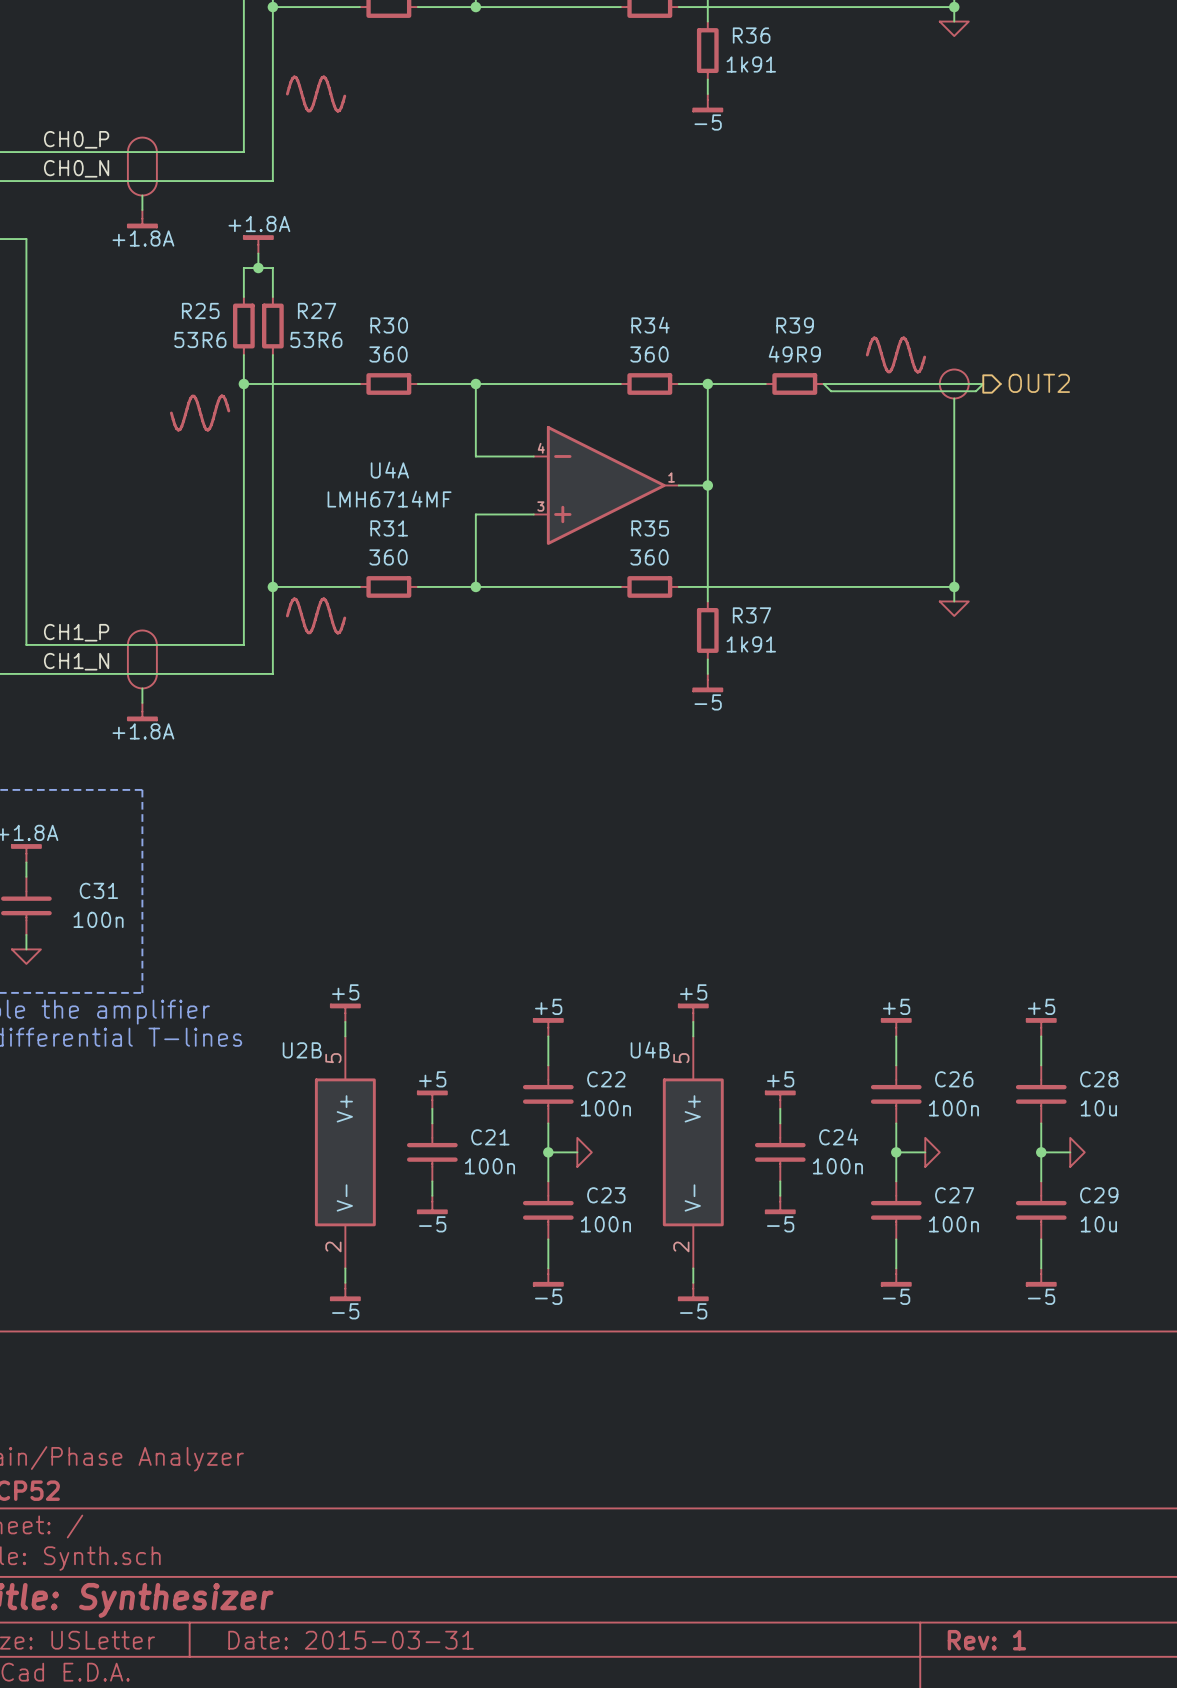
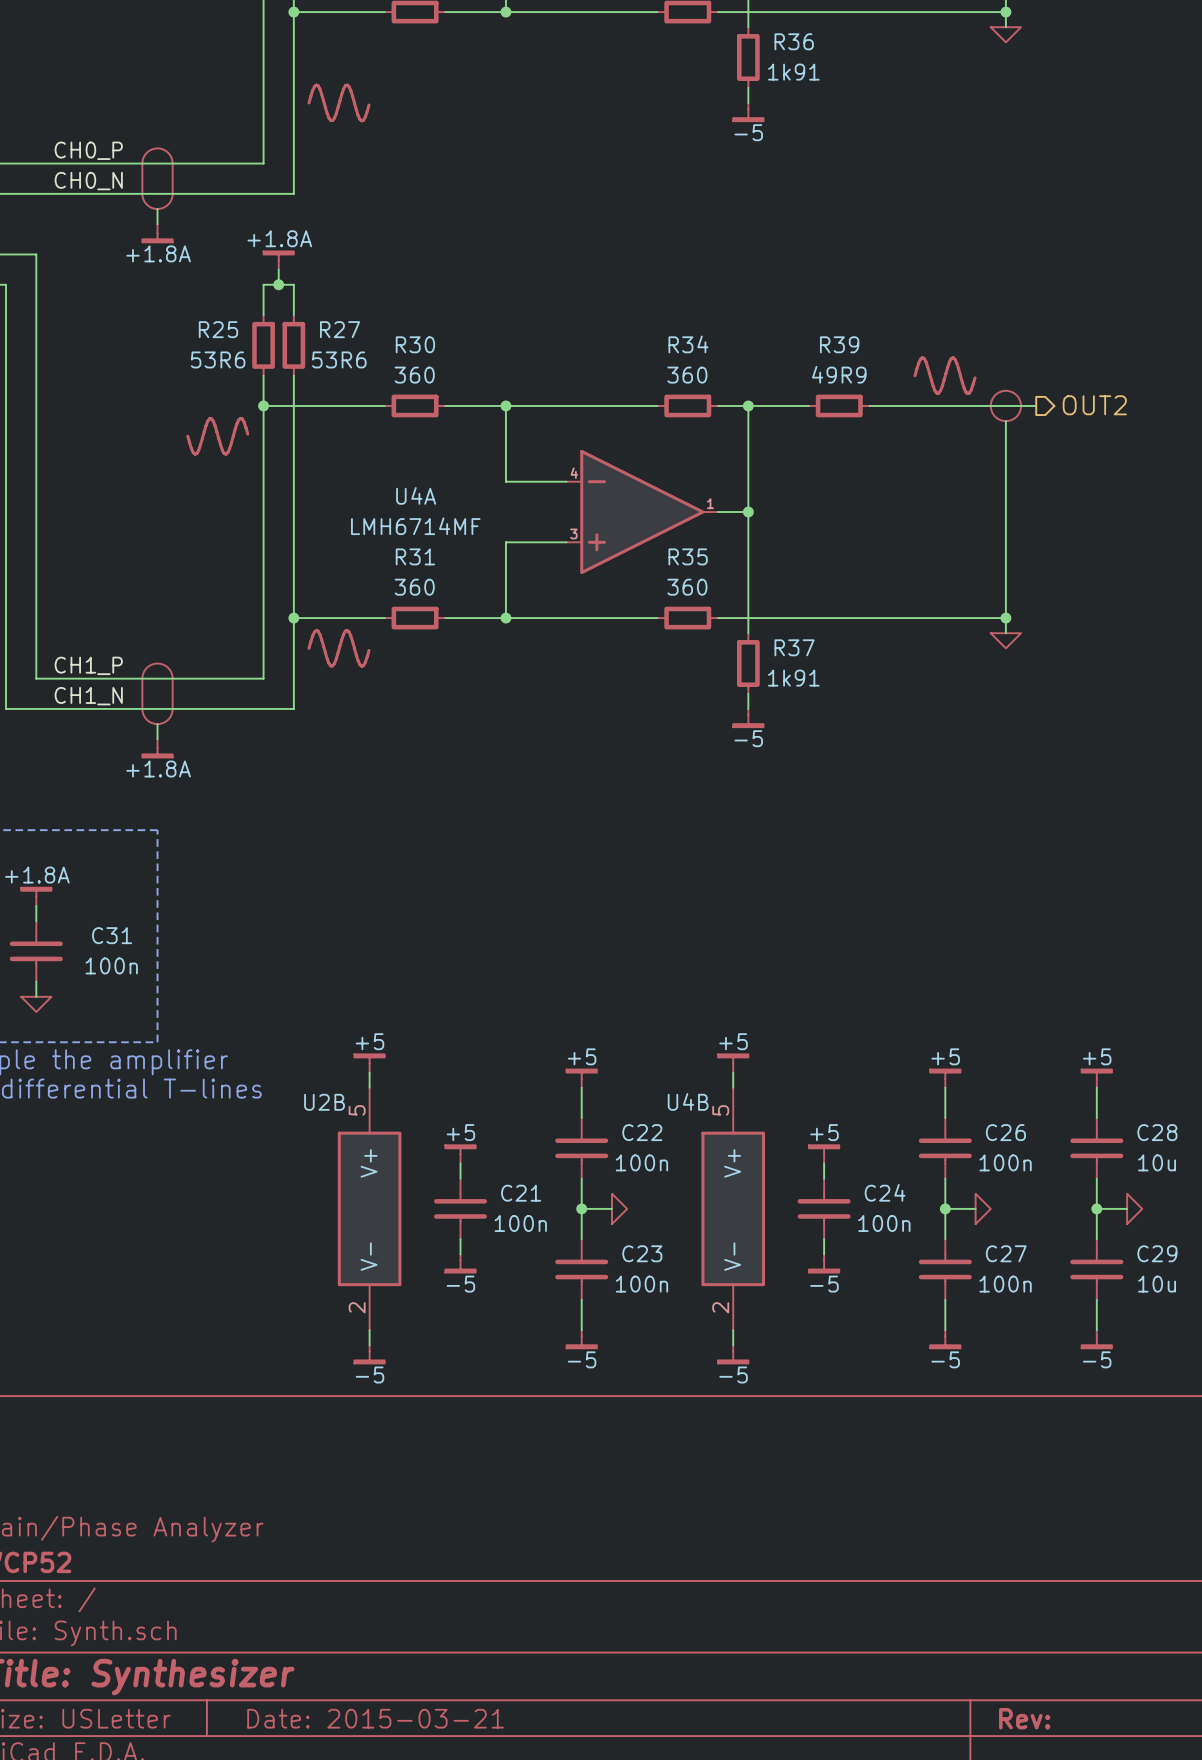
wire: (823, 384) (831, 391) (976, 391) (983, 384) -> none
title block: Date: 2015-03-31 (351, 1640) -> Date: 2015-03-21 (375, 1718)
title block: Rev: 1 (986, 1640) -> Rev: (1024, 1718)

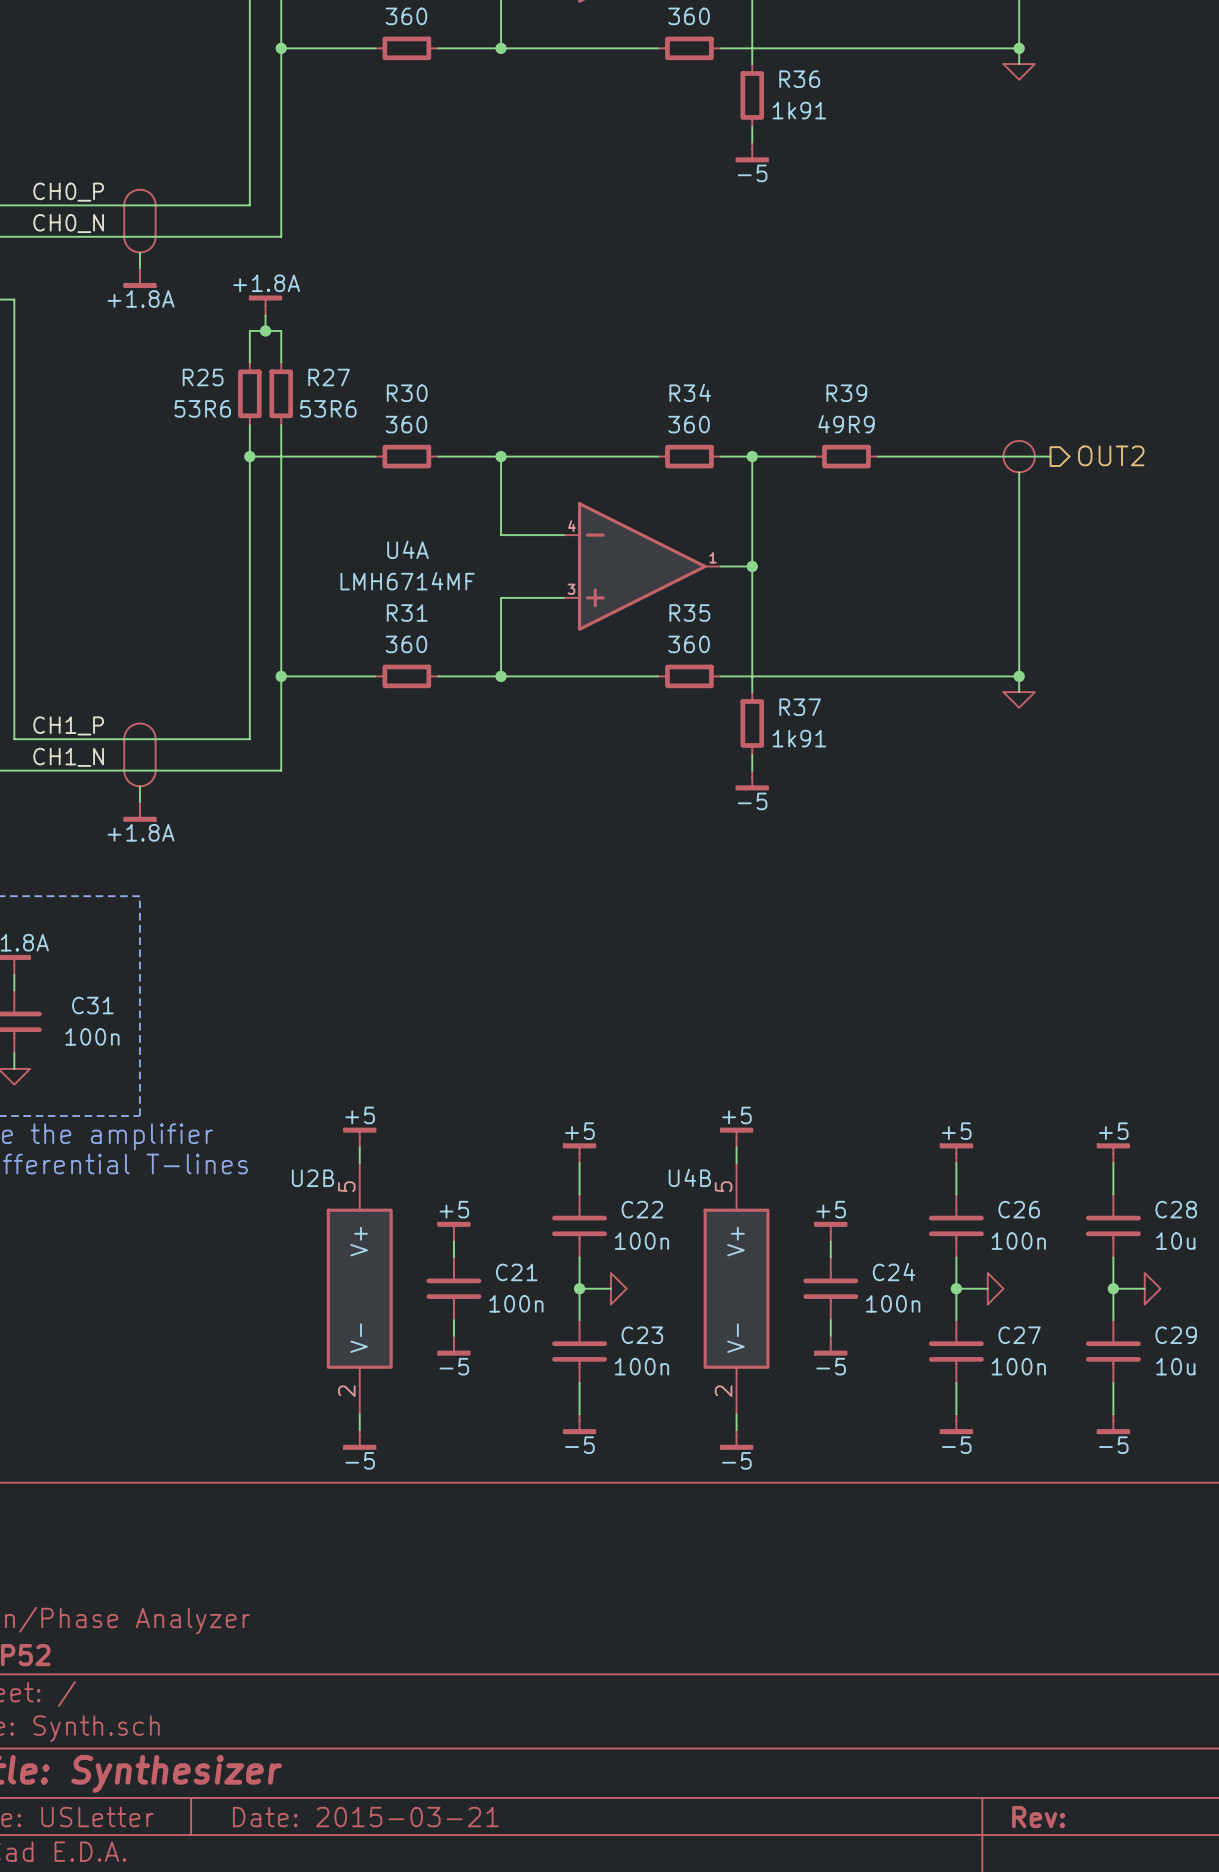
power symbol: (339, 102) -> none
power symbol: (945, 375) -> none
power symbol: (217, 436) -> none
power symbol: (339, 648) -> none

